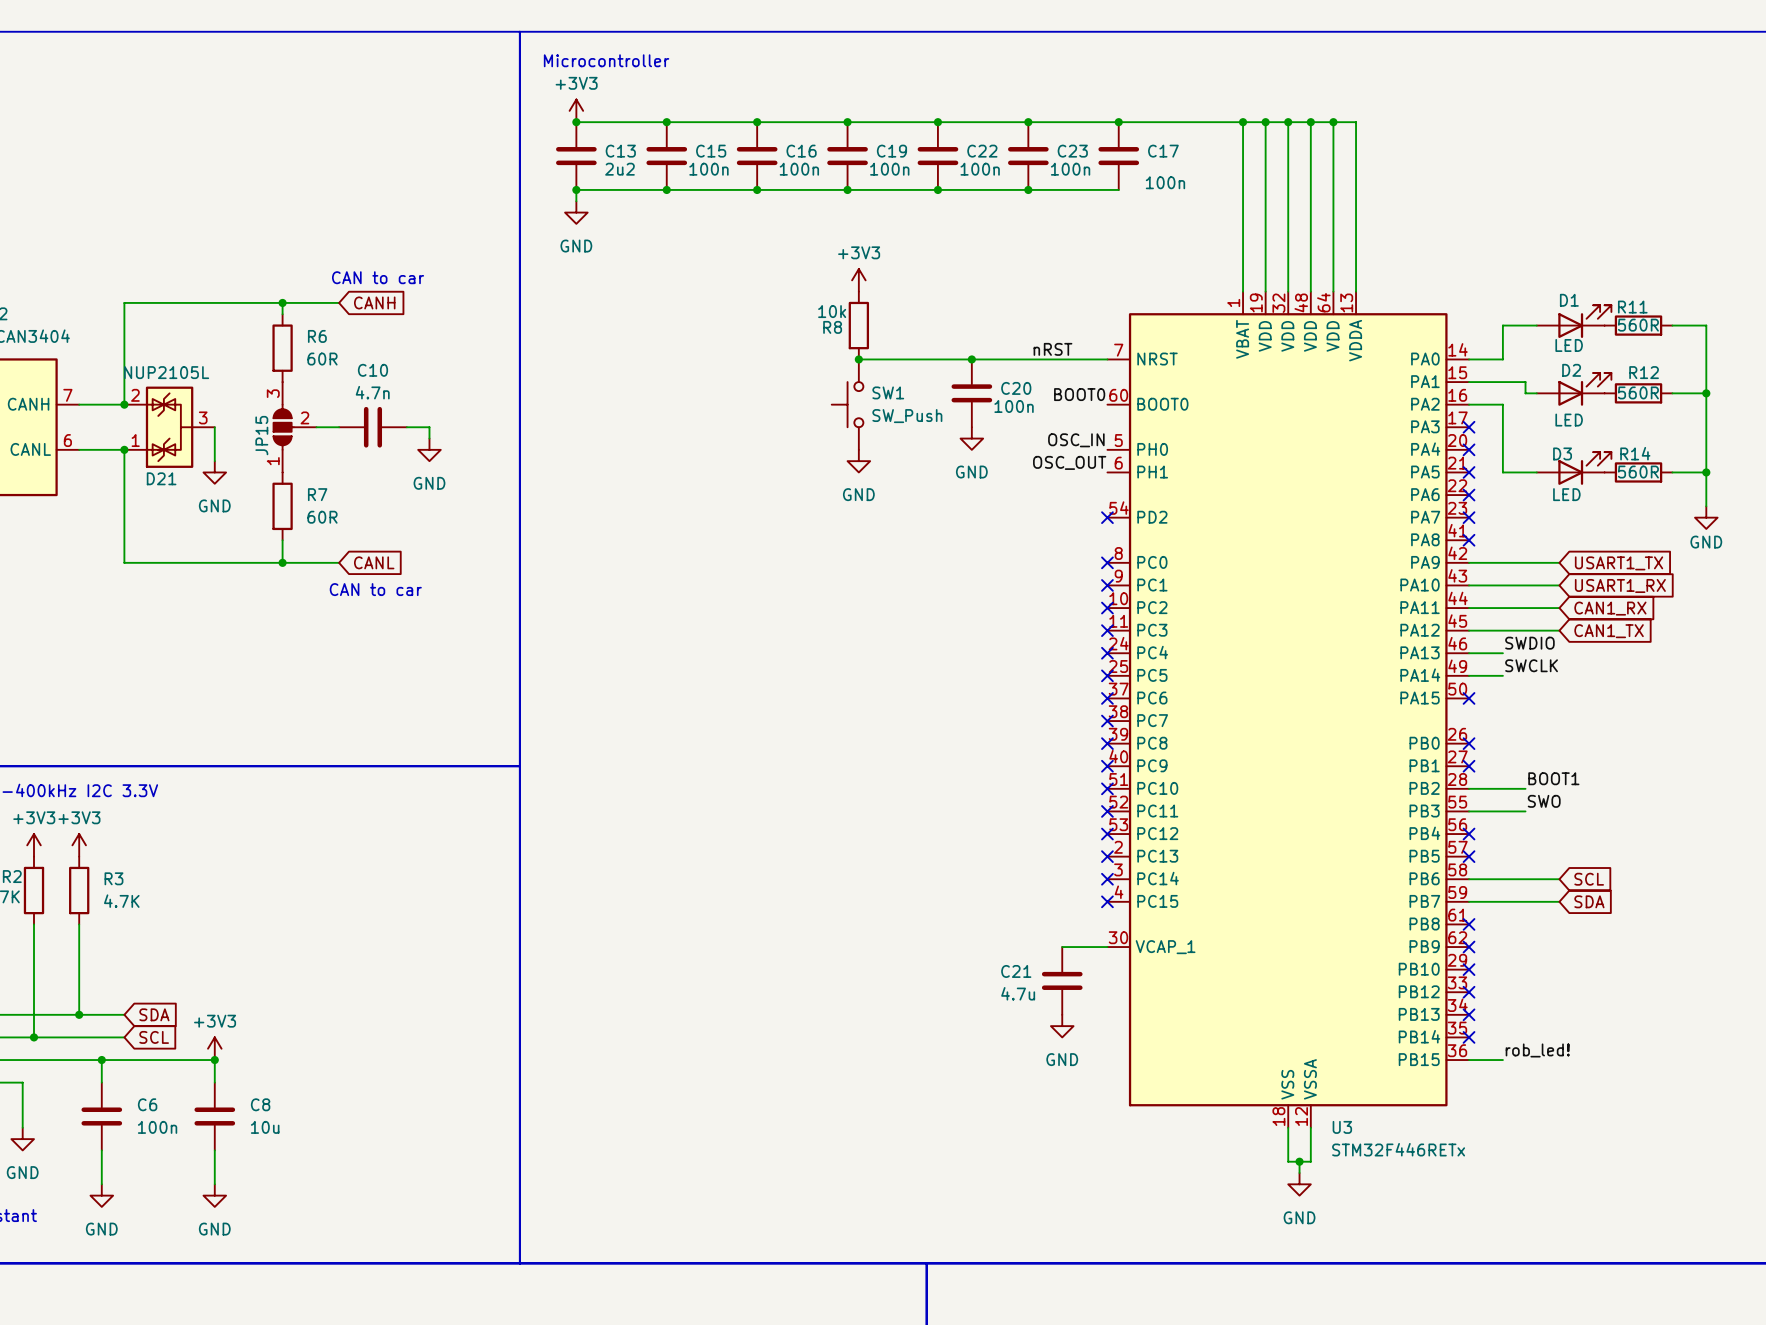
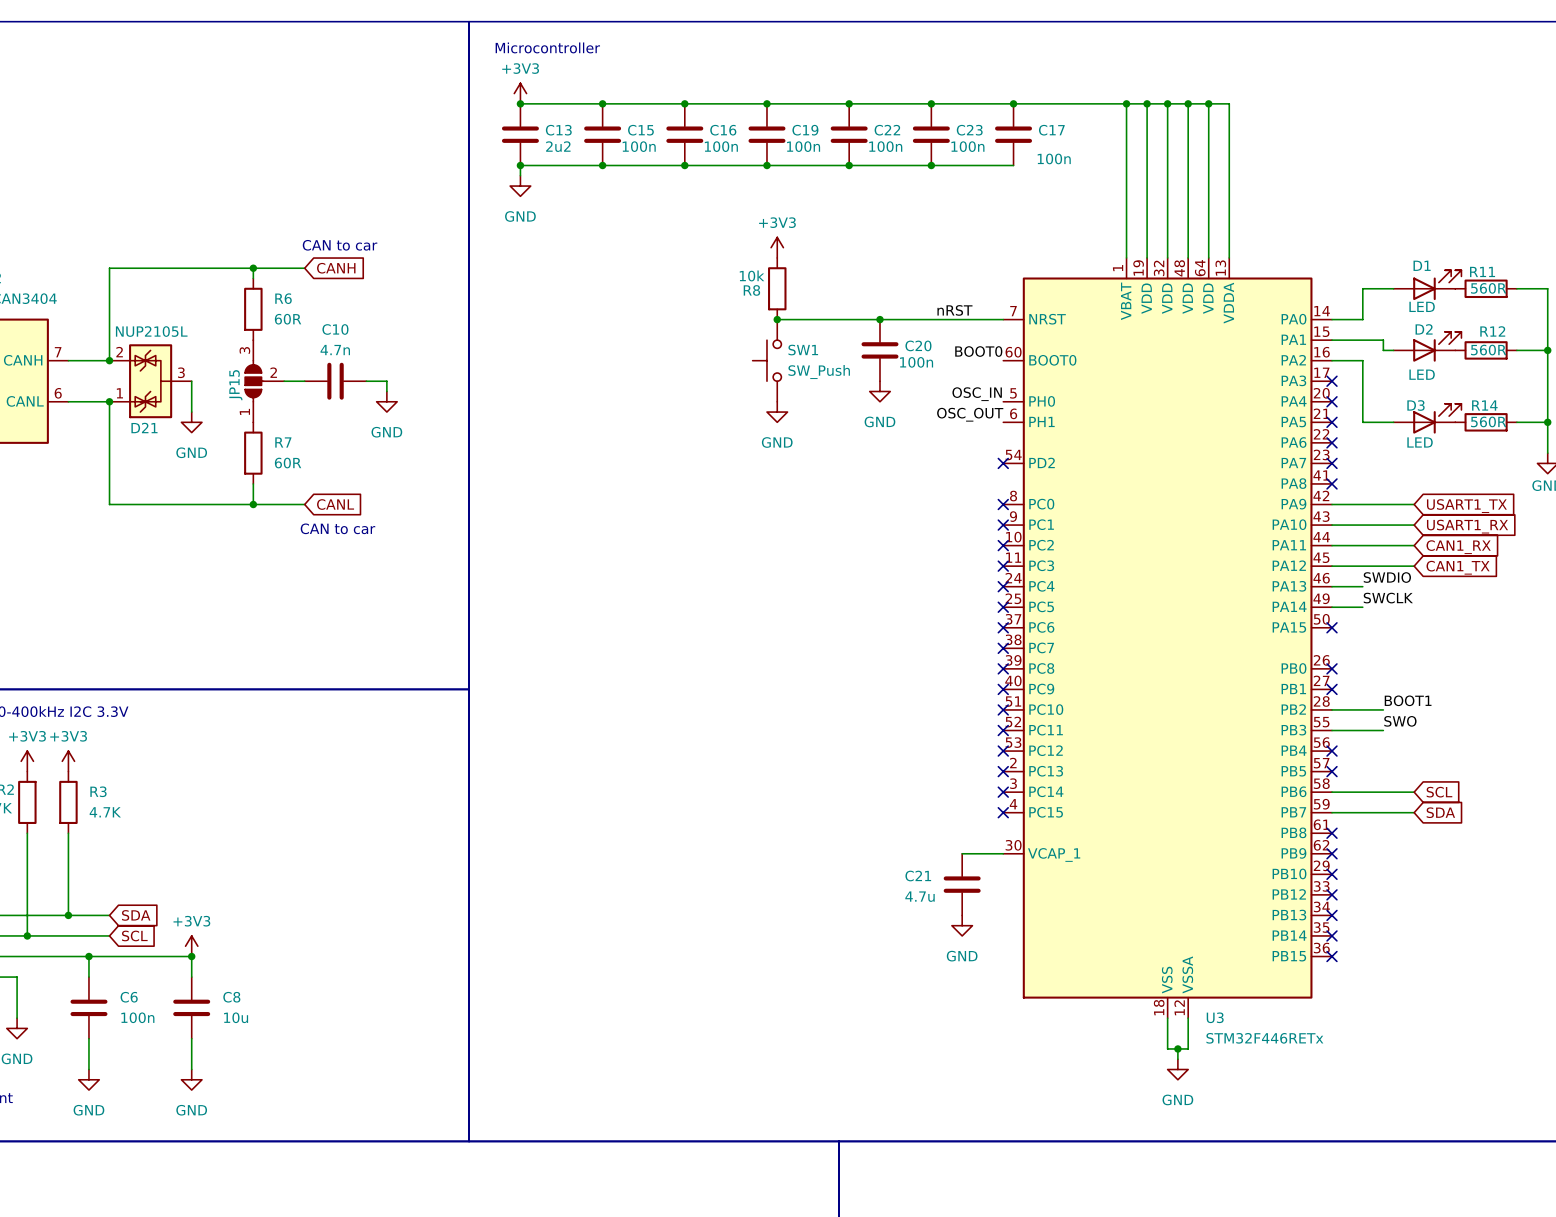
label: rob_led! (1537, 1050) -> none
wire: (1469, 1060) (1502, 1060) -> none
no-connect mark: none -> (1331, 956)

